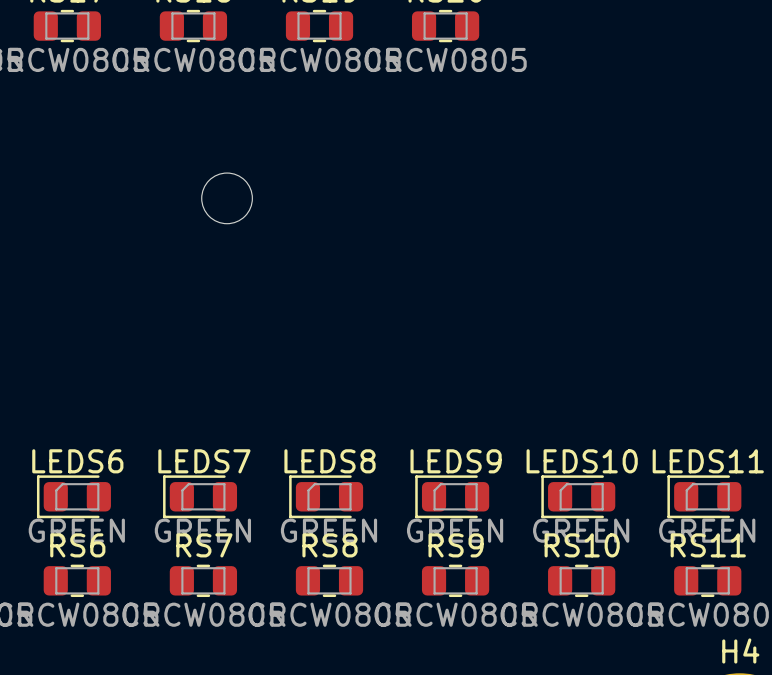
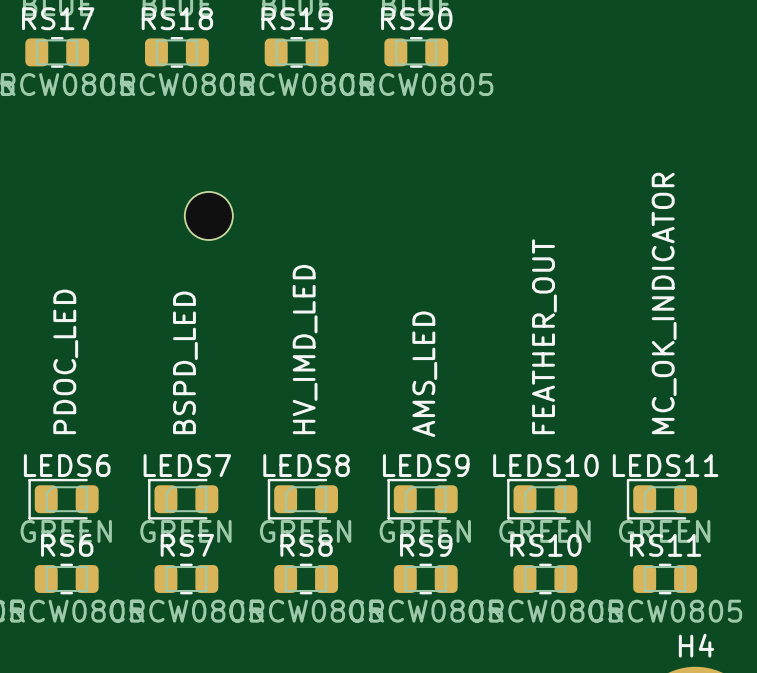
text: none -> MC_OK_INDICATOR (664, 303)
text: none -> FEATHER_OUT (544, 336)
text: none -> HV_IMD_LED (305, 349)
text: none -> PDOC_LED (65, 361)
text: none -> BSPD_LED (185, 362)
text: none -> AMS_LED (424, 374)

